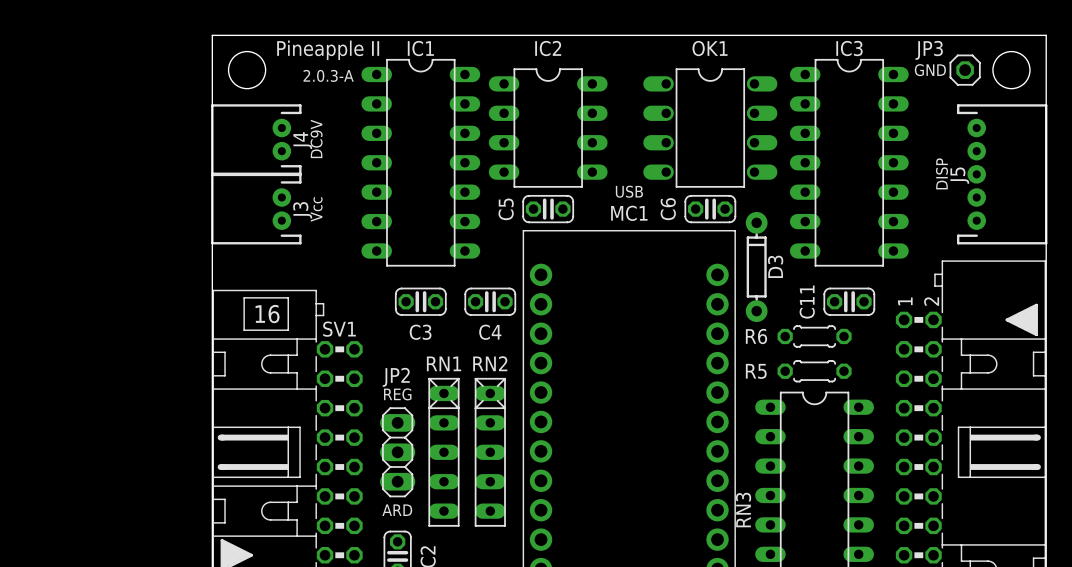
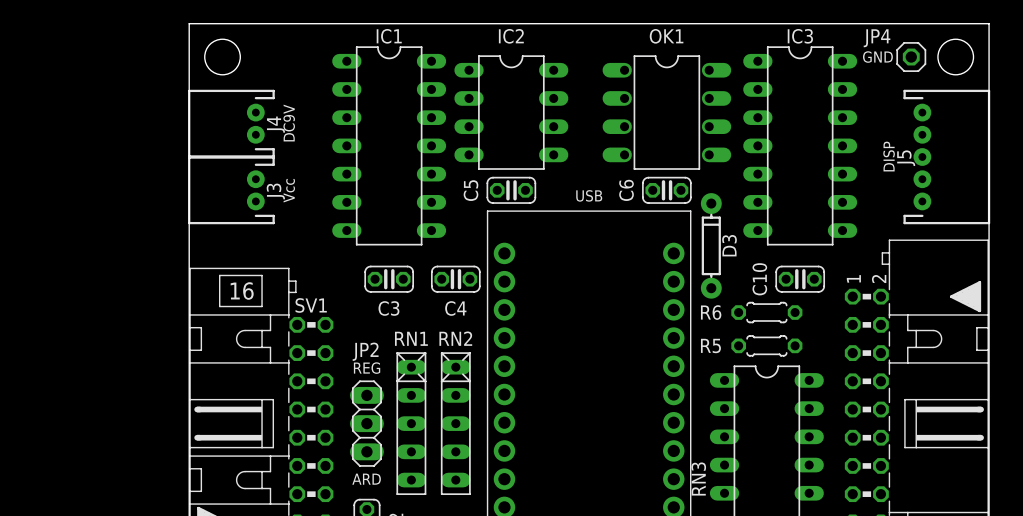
text: Pineapple II (328, 50) -> none
JP3 name: JP3 (929, 50) -> JP4 (877, 38)
text: 2.0.3-A (328, 75) -> none
text: USB (629, 191) -> none
text: MC1 (629, 213) -> USB (589, 195)
C11 name: C11 (807, 302) -> C10 (759, 279)

